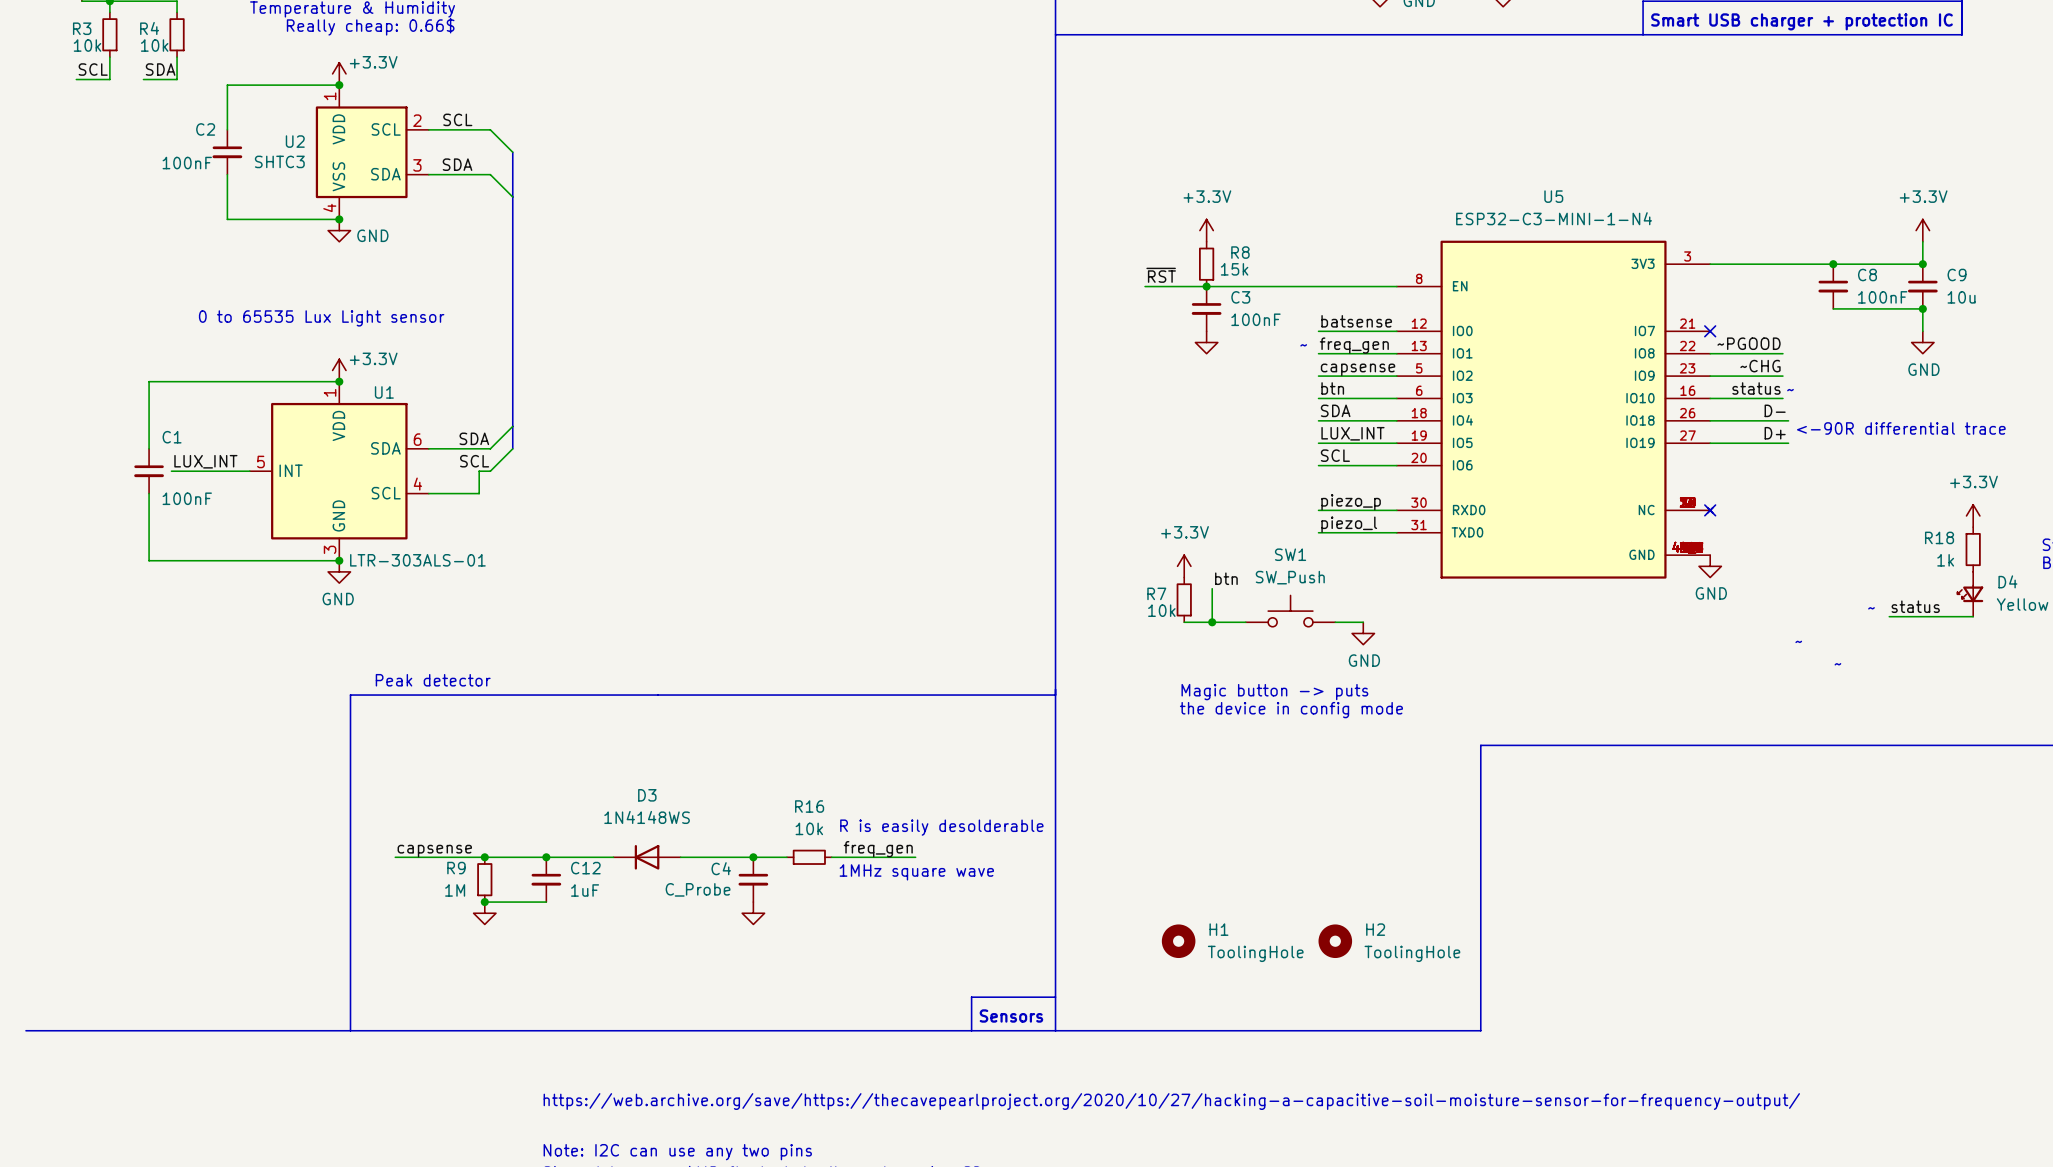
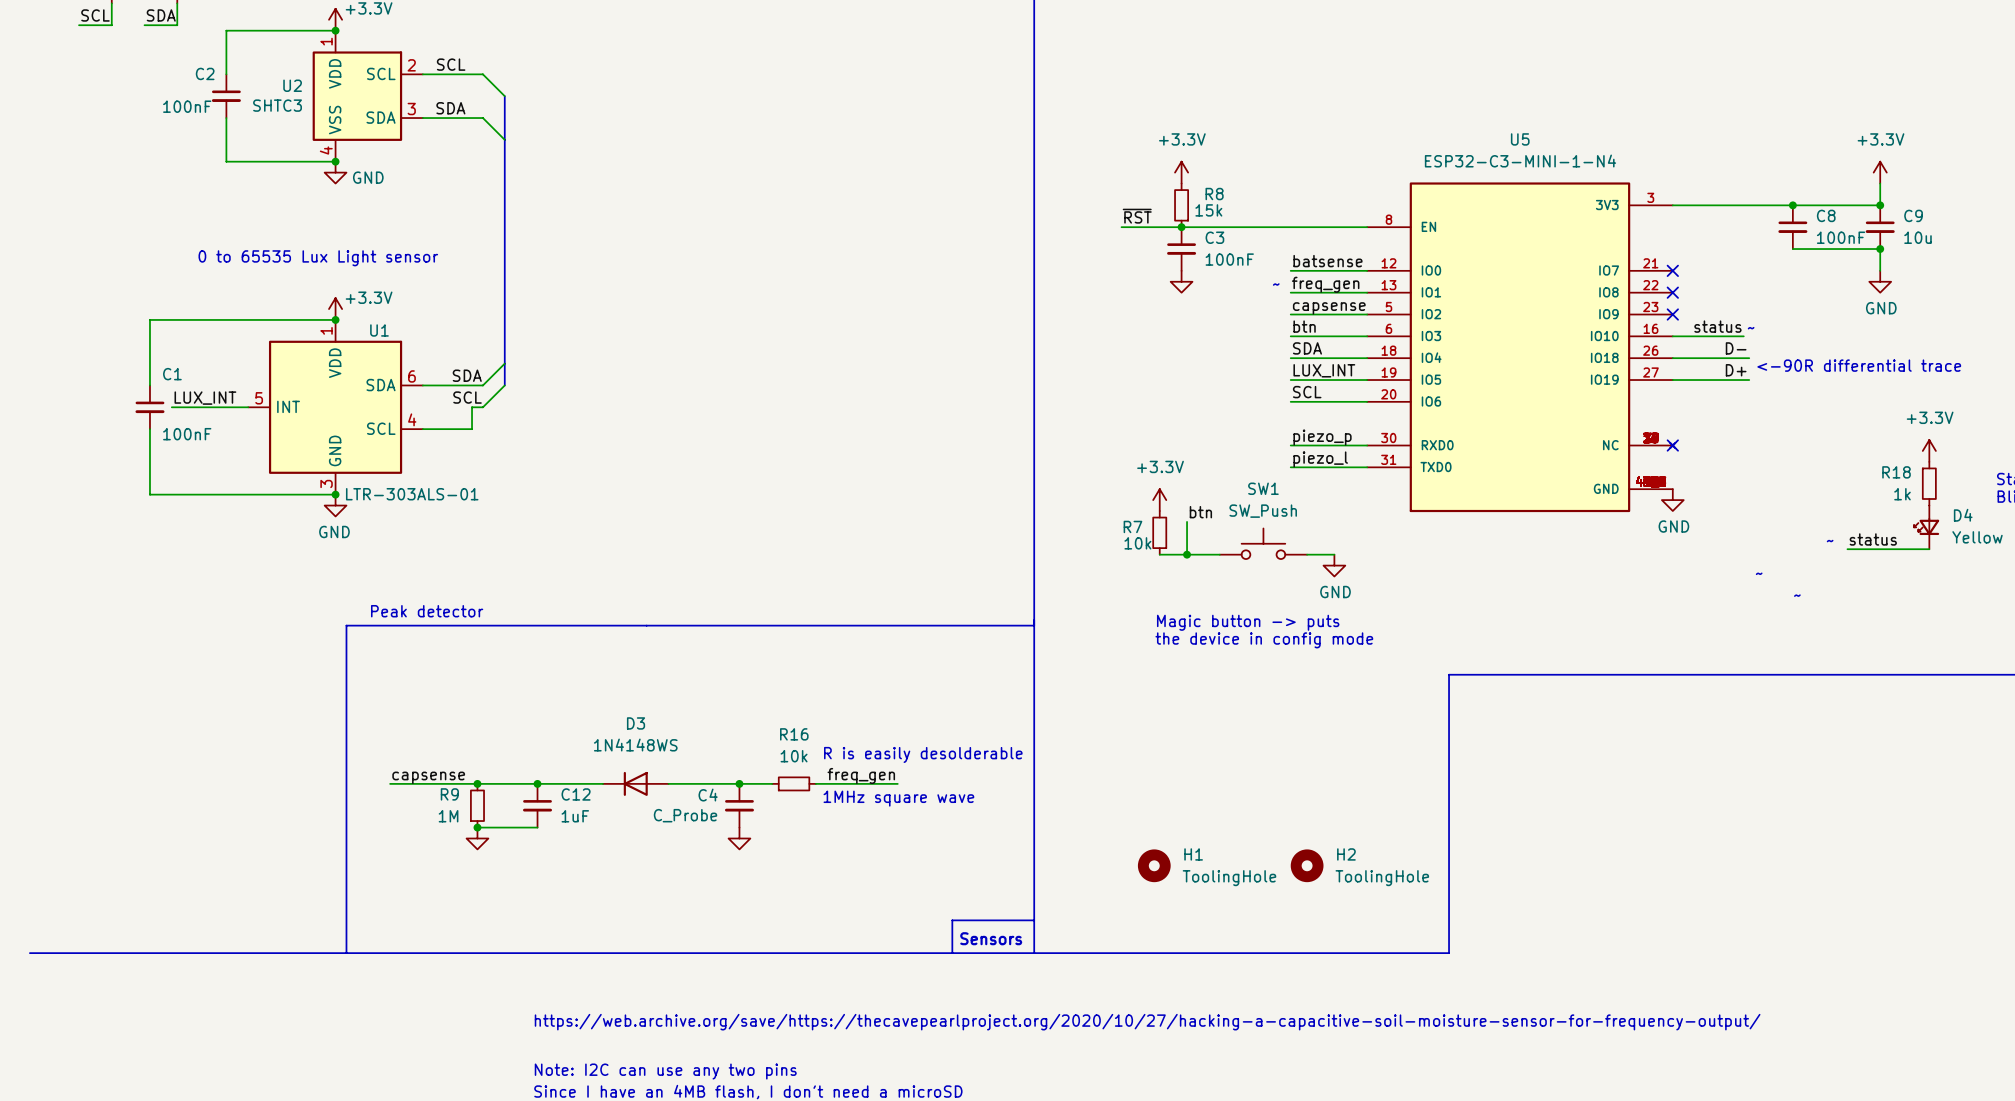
label: ~PGOOD (1749, 343) -> none
wire: (1710, 353) (1782, 353) -> none
no-connect mark: none -> (1672, 292)
label: ~CHG (1760, 366) -> none
wire: (1710, 376) (1782, 376) -> none
no-connect mark: none -> (1672, 314)

